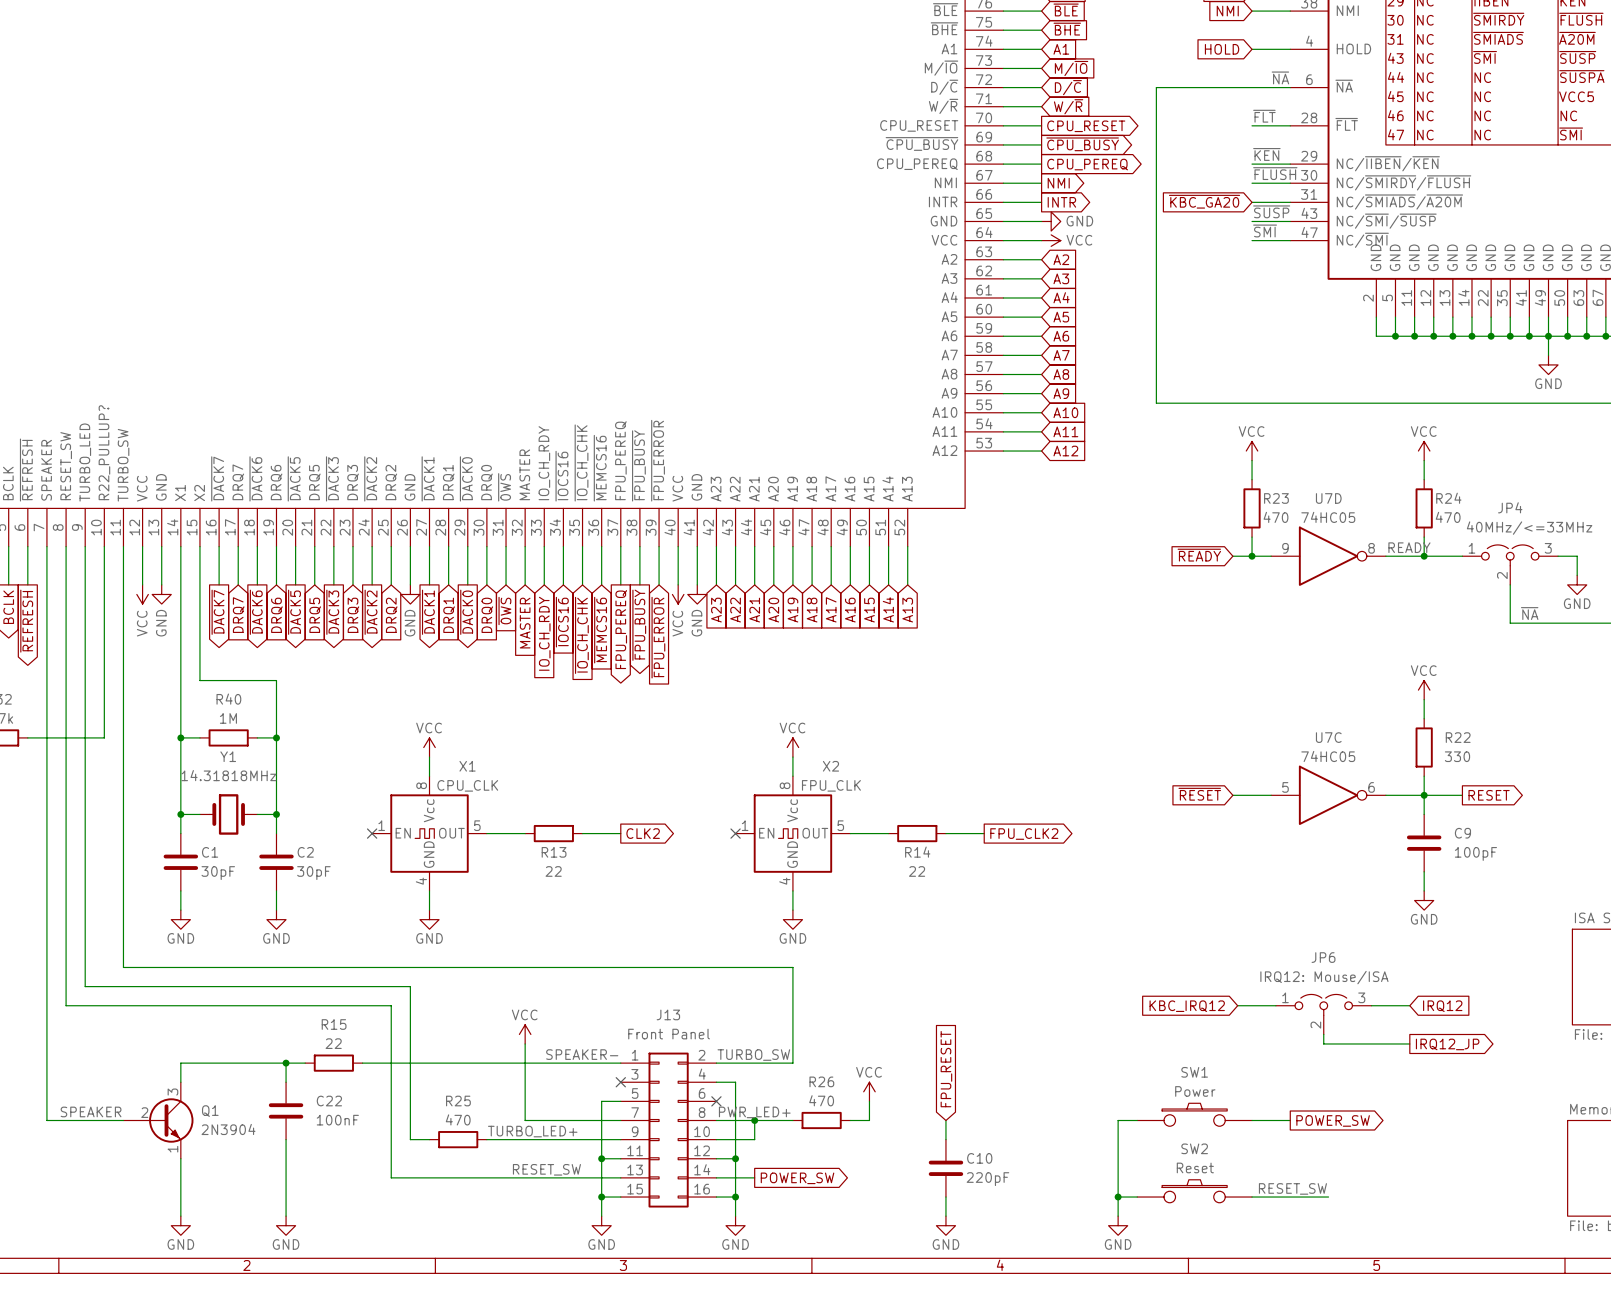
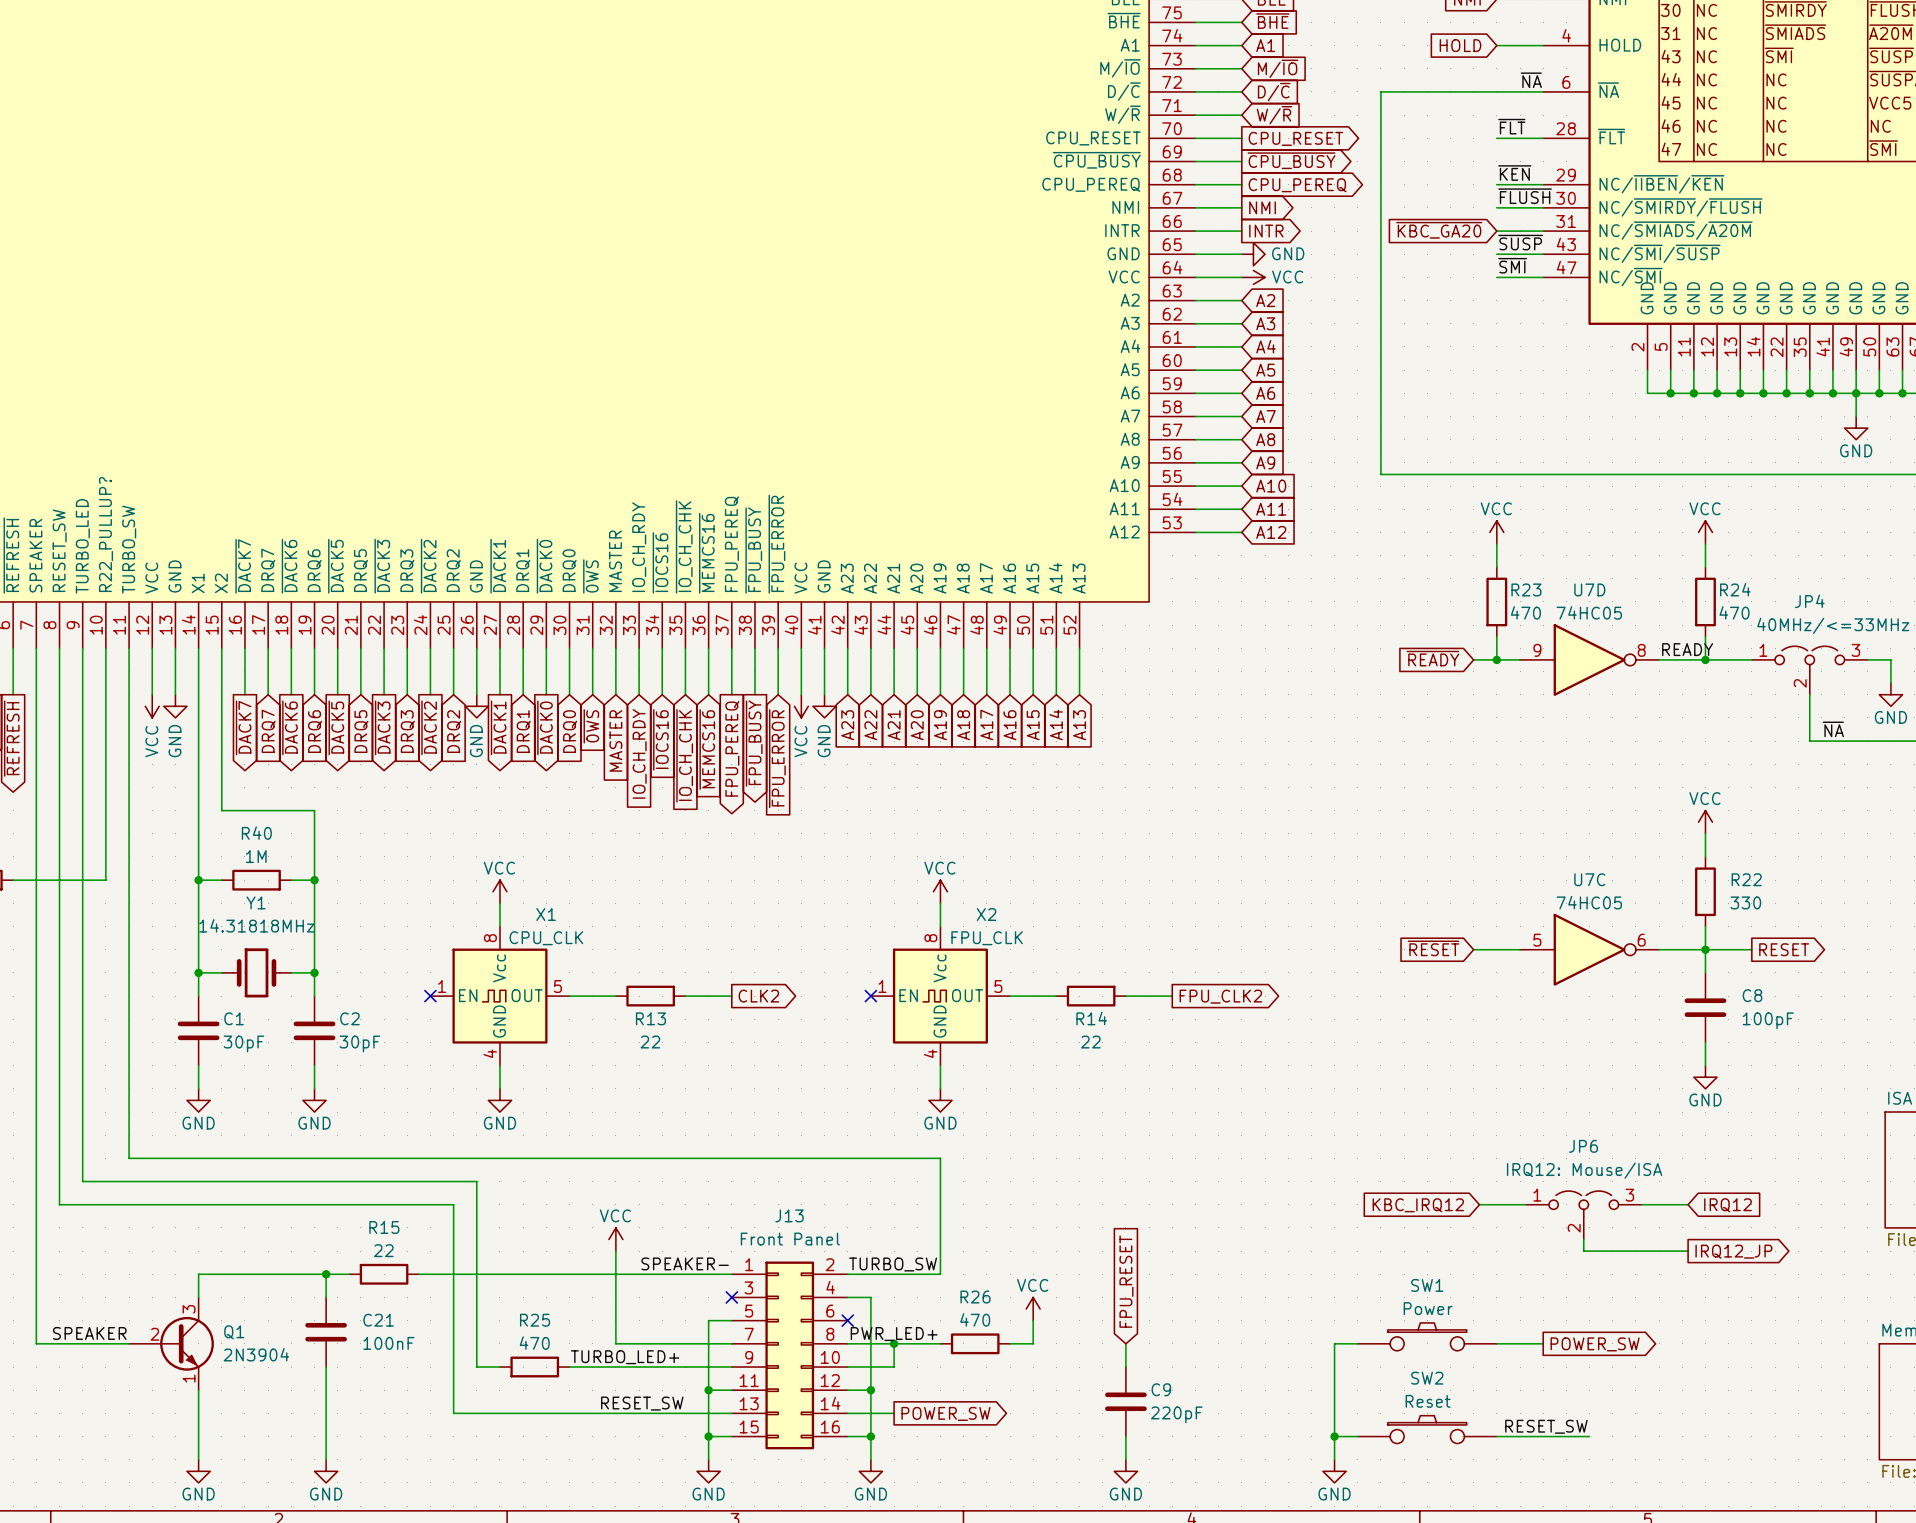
C9 name: C9 (1462, 833) -> C8 (1752, 995)
C22 name: C22 (329, 1101) -> C21 (378, 1320)
C10 name: C10 (979, 1158) -> C9 (1161, 1389)

